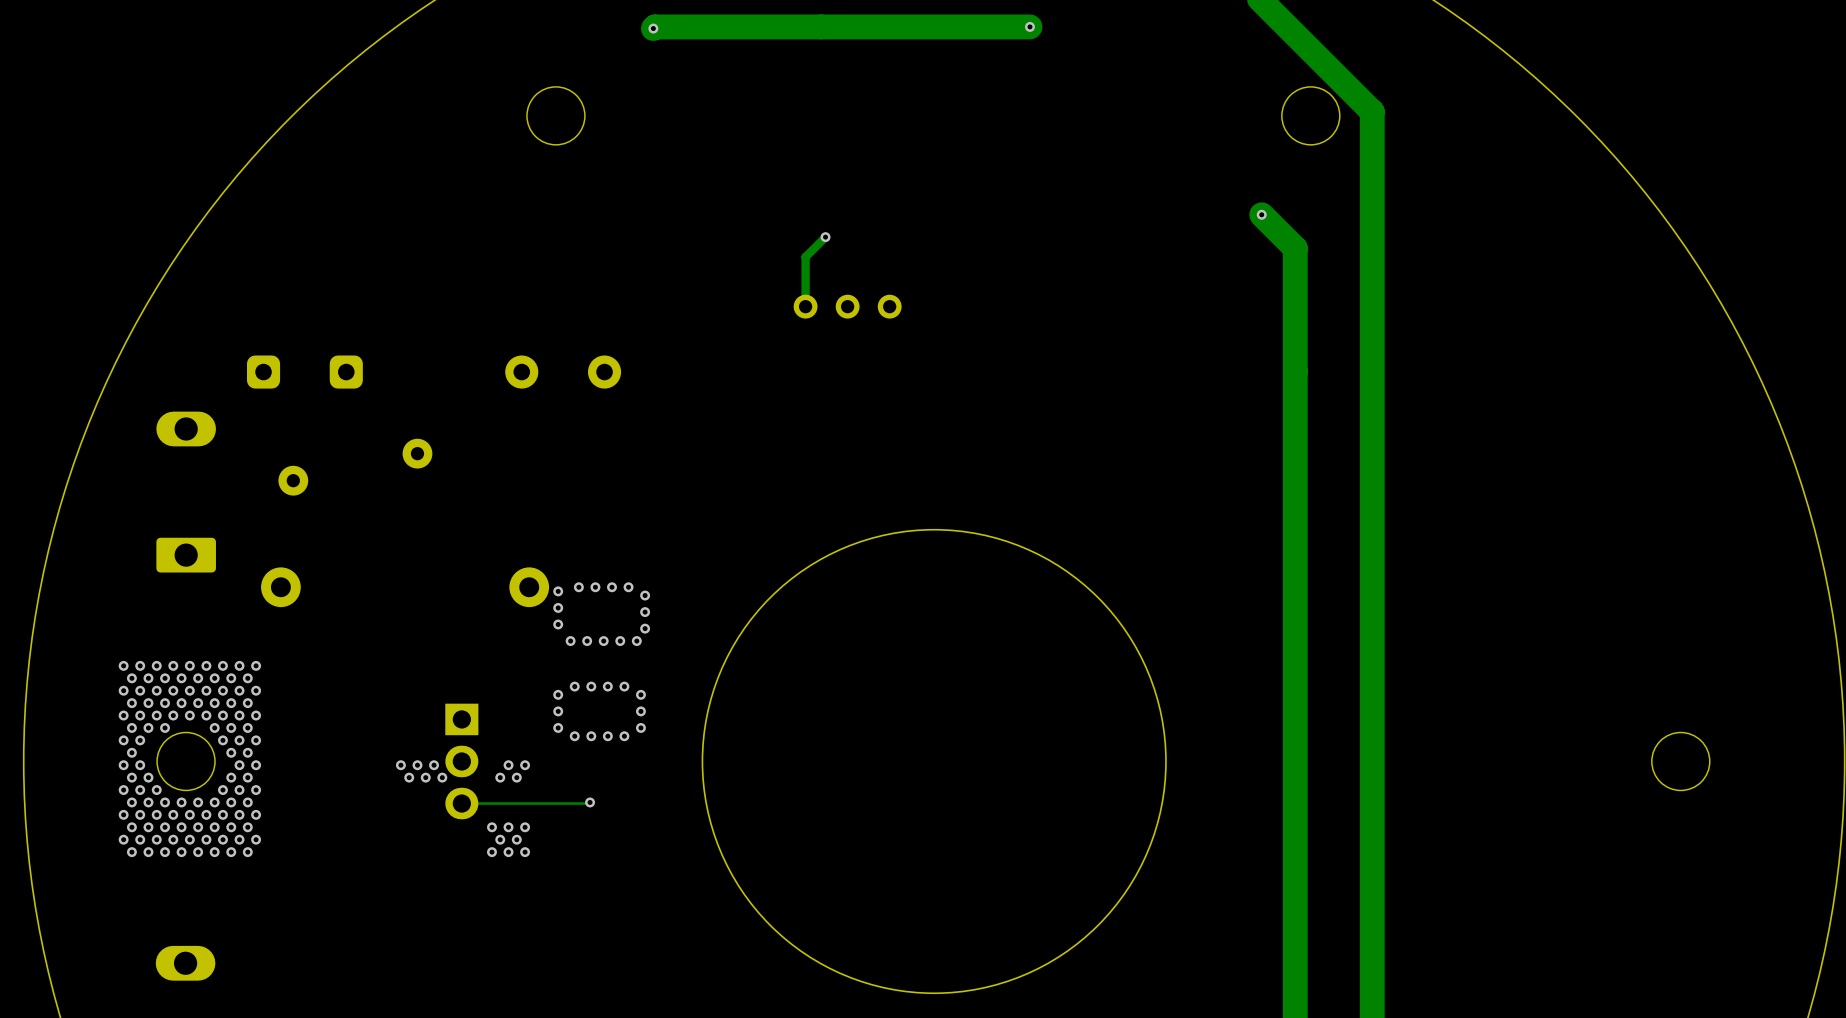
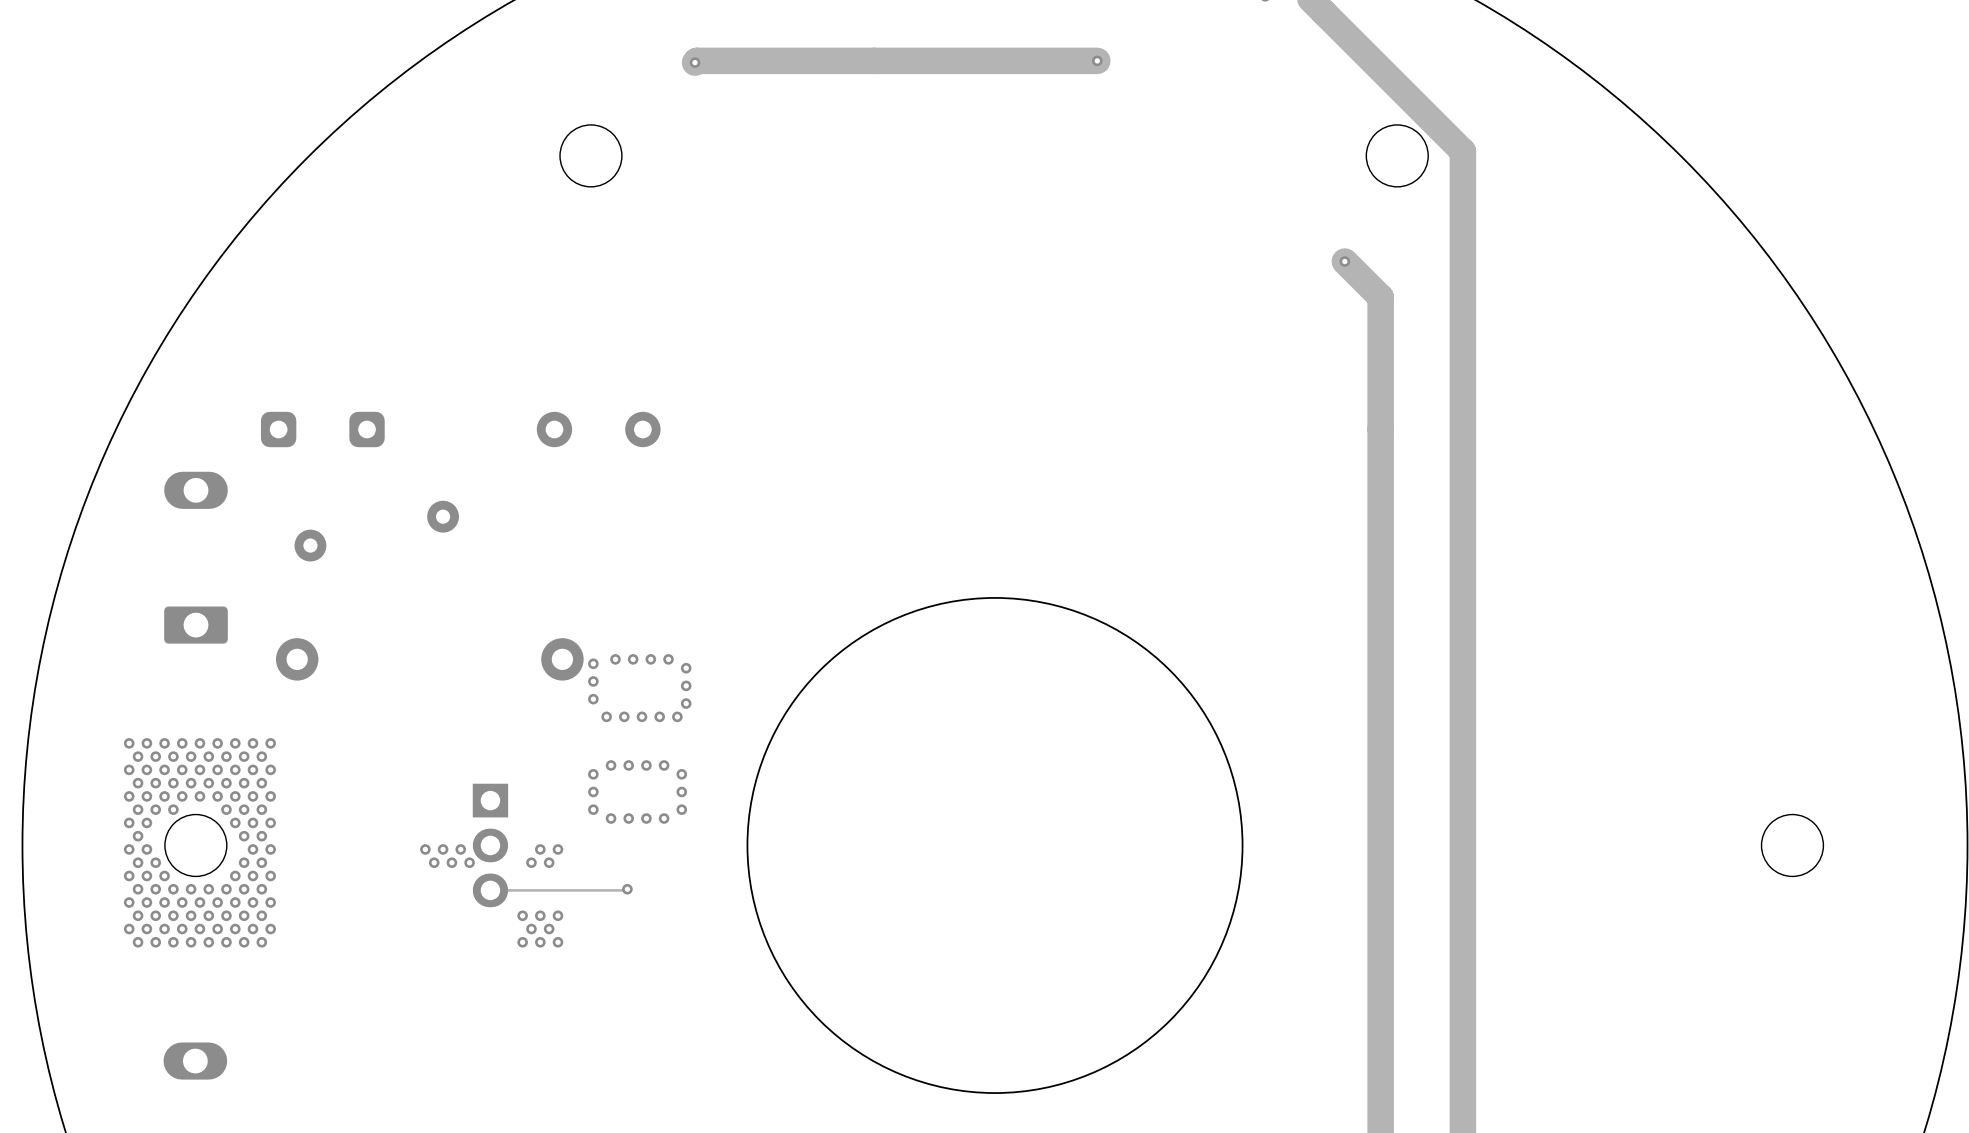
track: (825, 237) (805, 257) (805, 306) -> none
via: (825, 237) -> none
part: (847, 306) -> none

